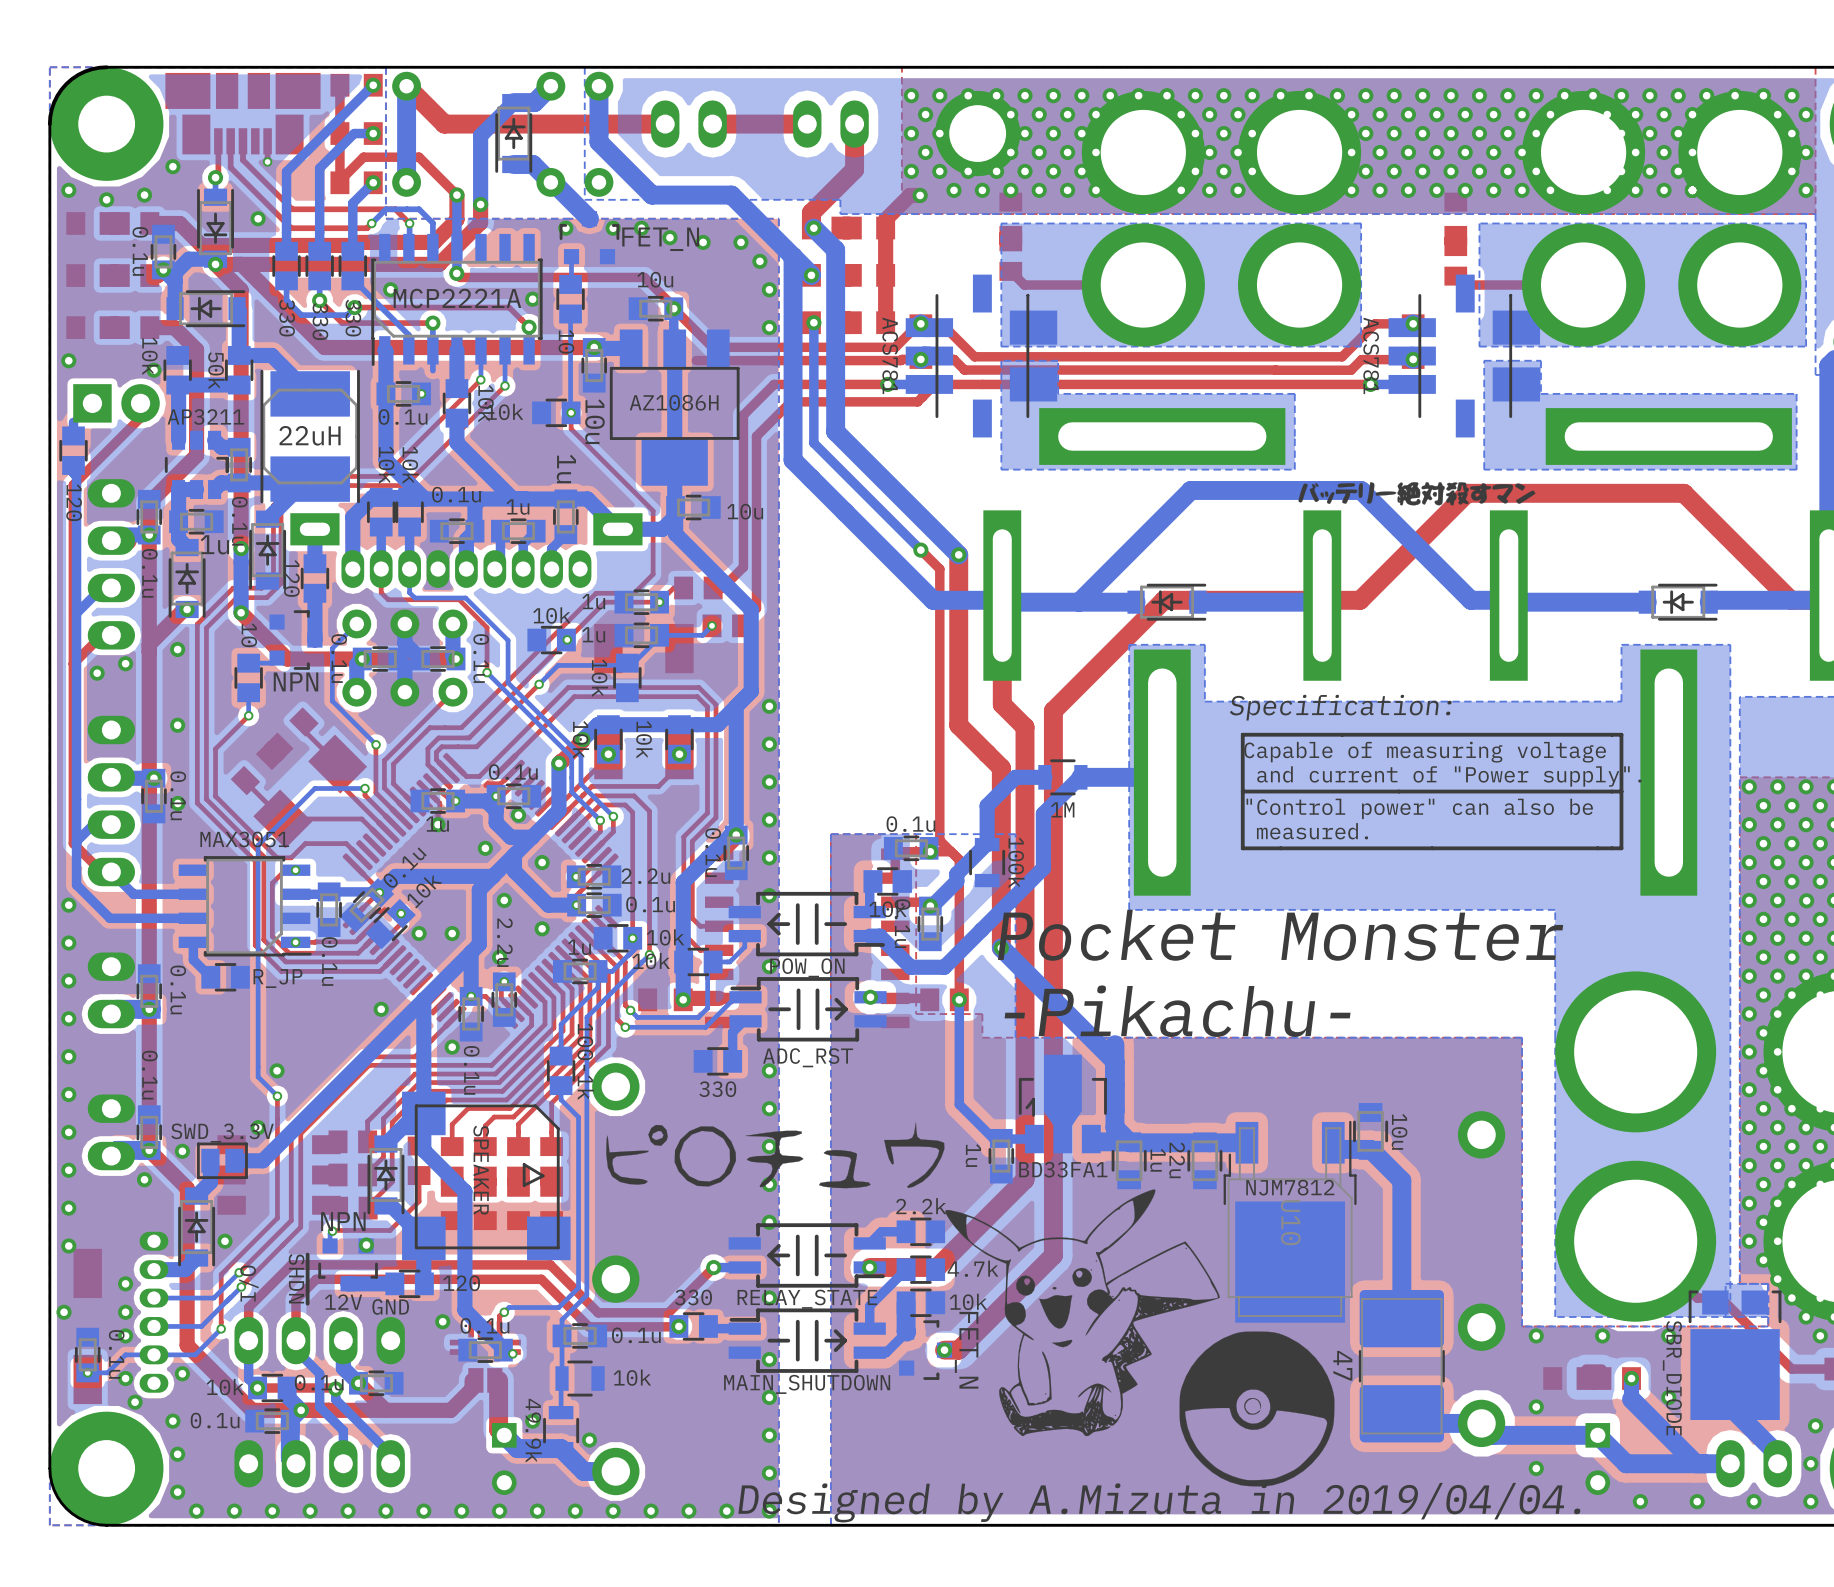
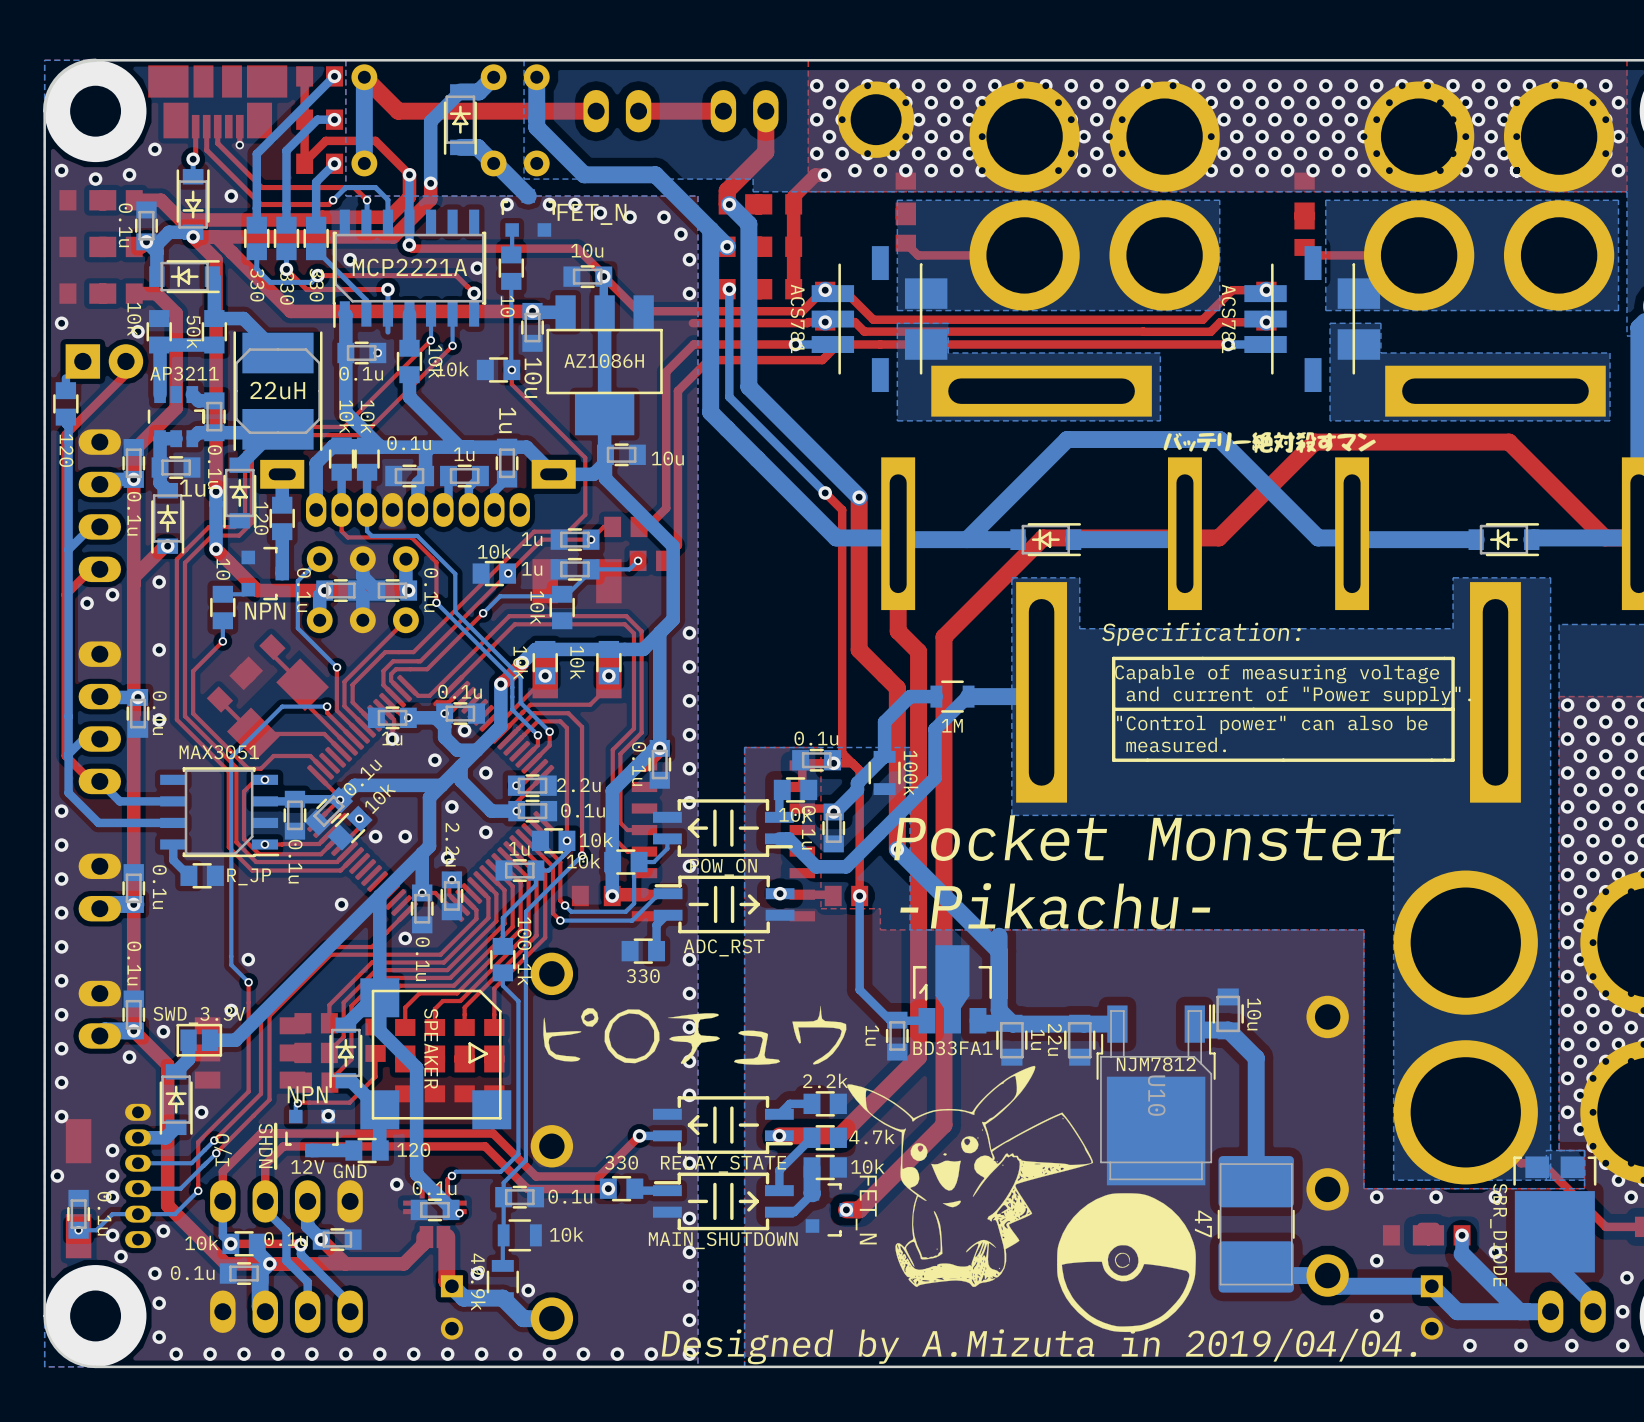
top track: (773, 360) (696, 360) -> none

